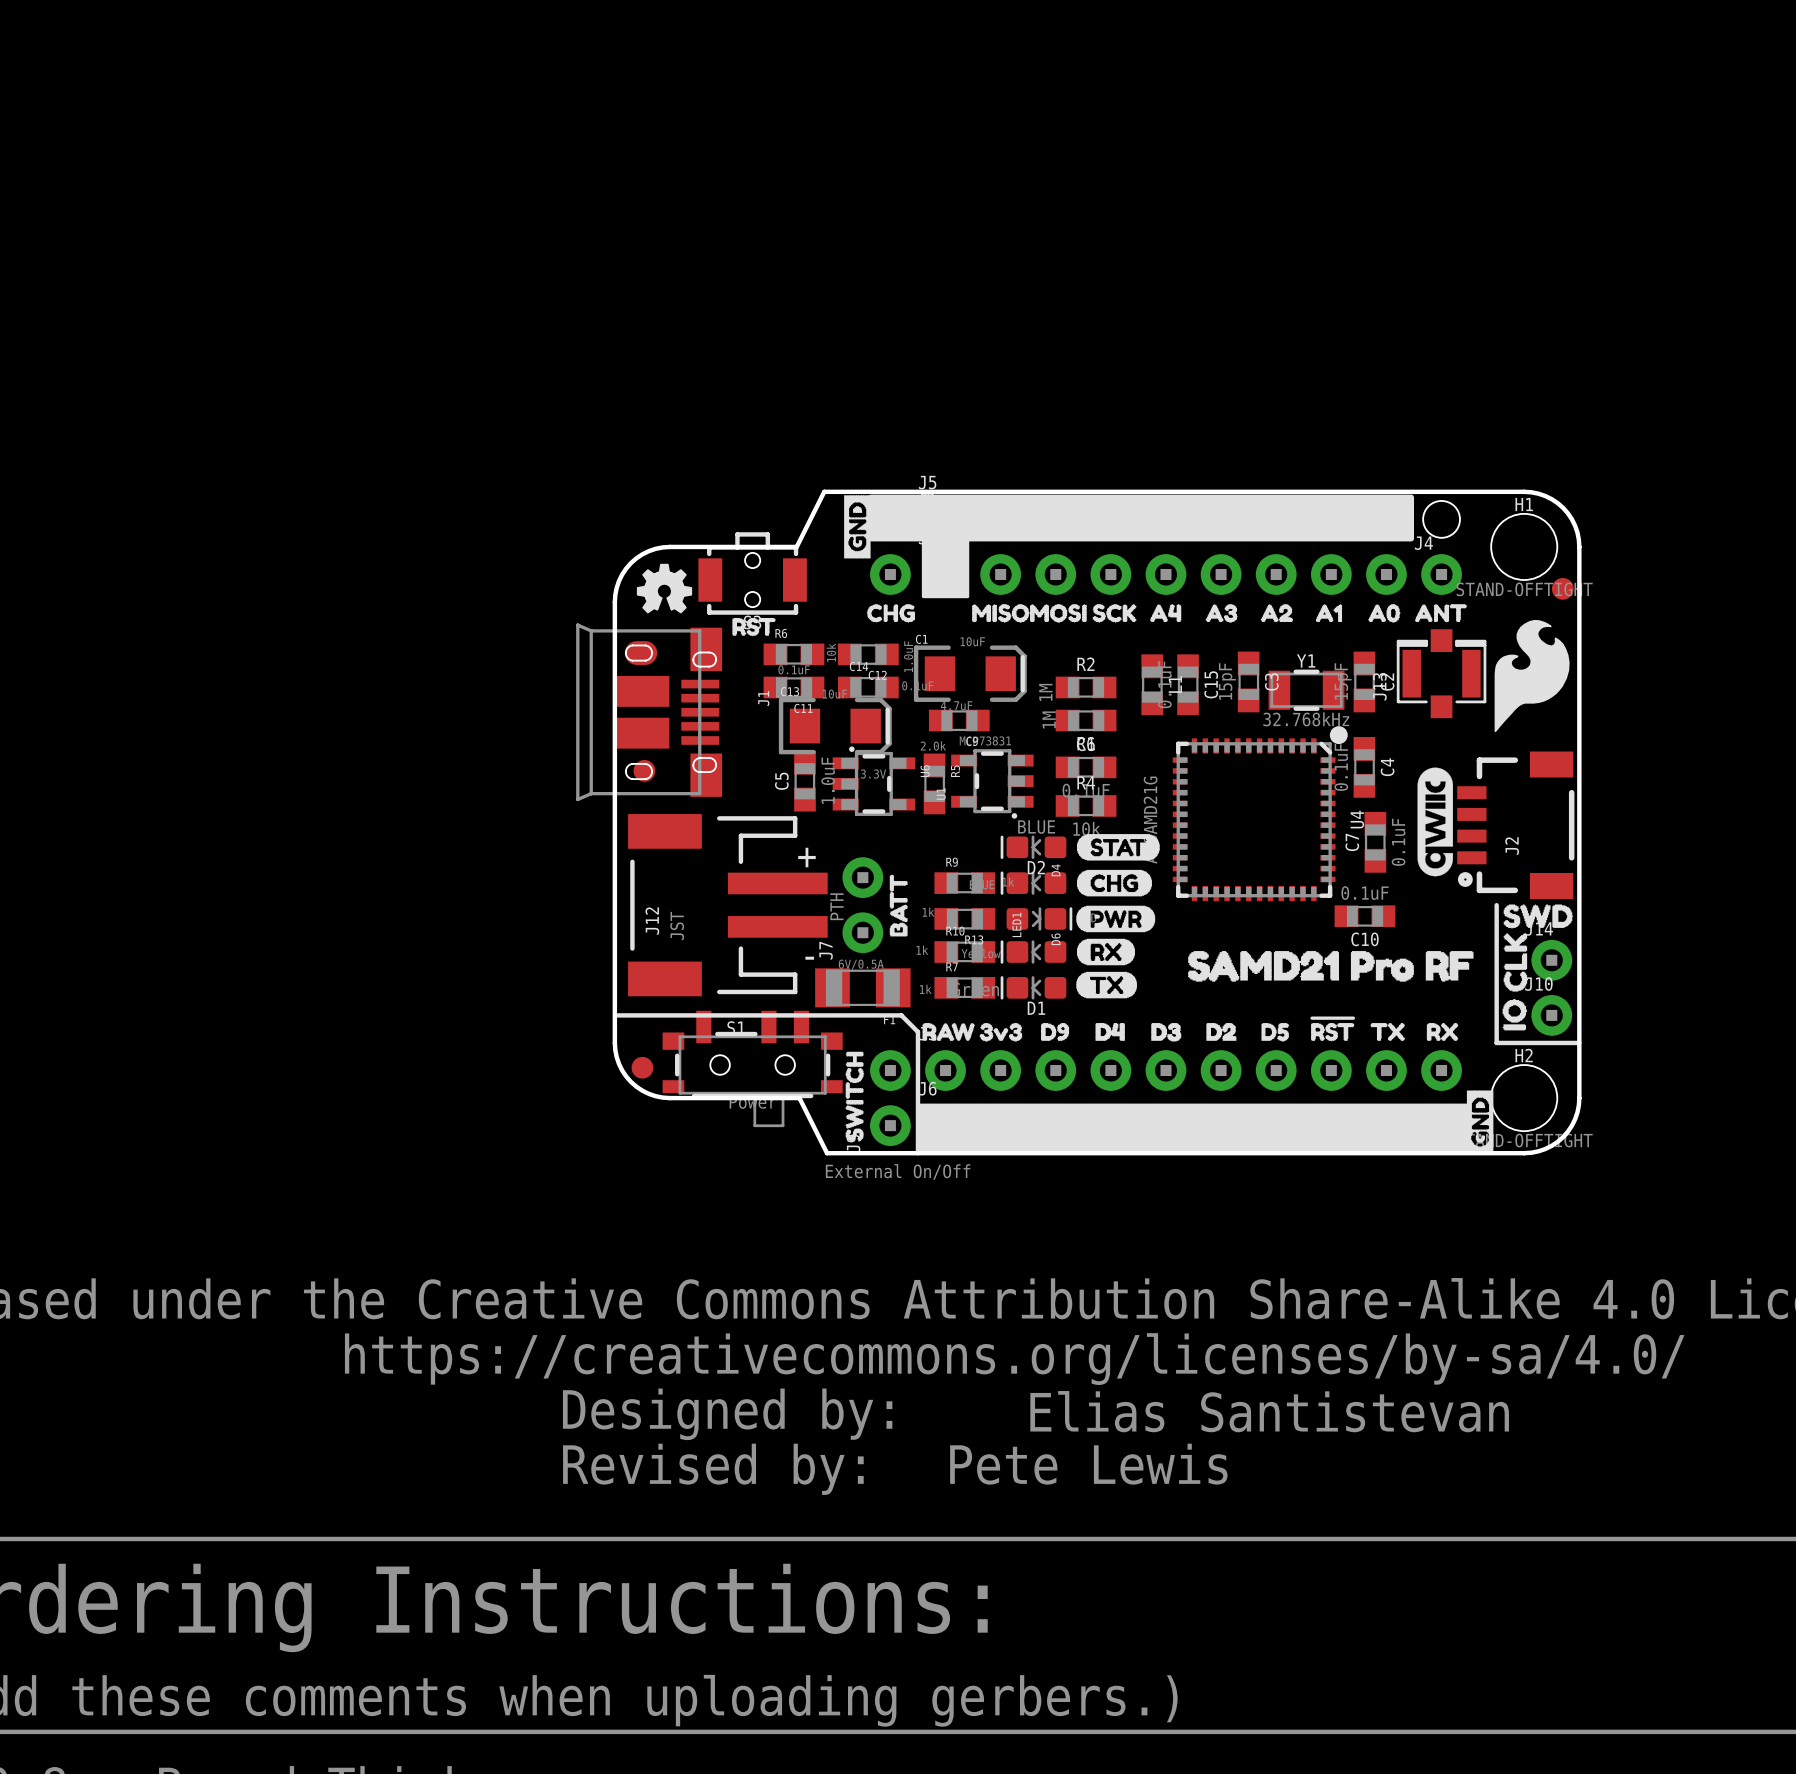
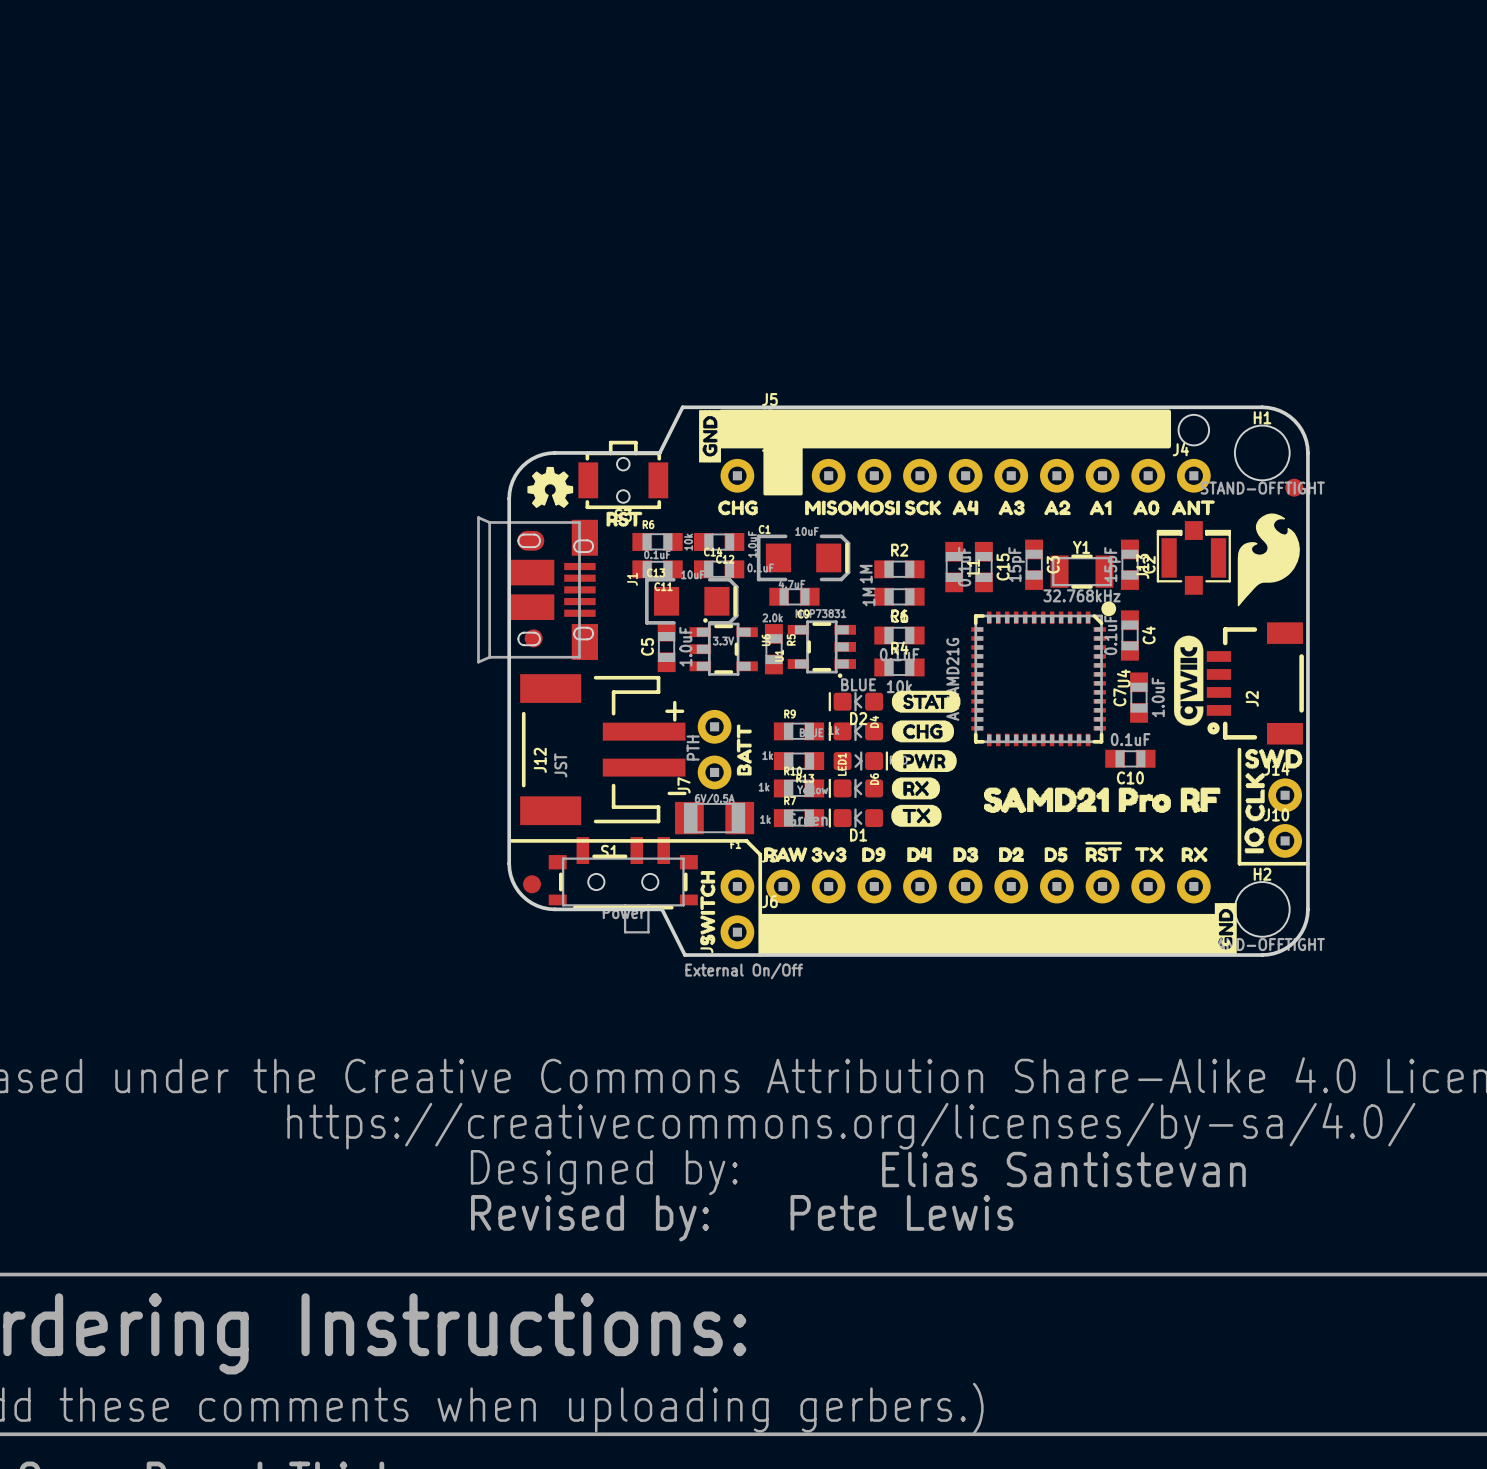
C7 value: 0.1uF (1398, 842) -> 1.0uF (1158, 697)

